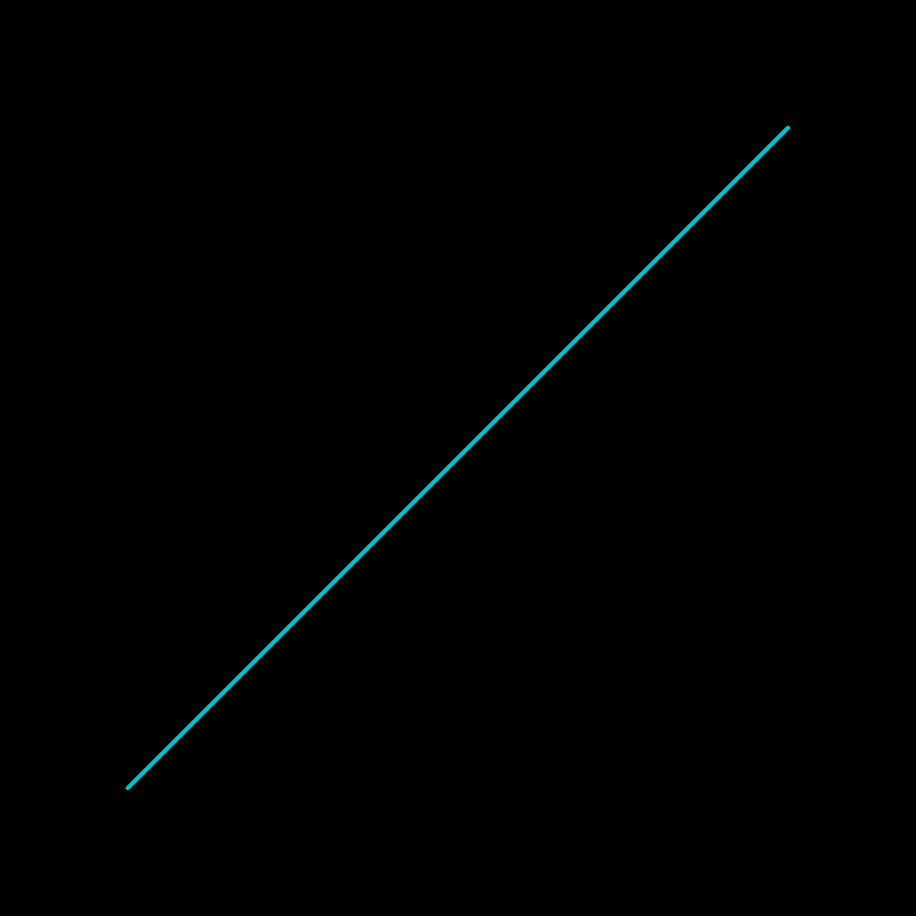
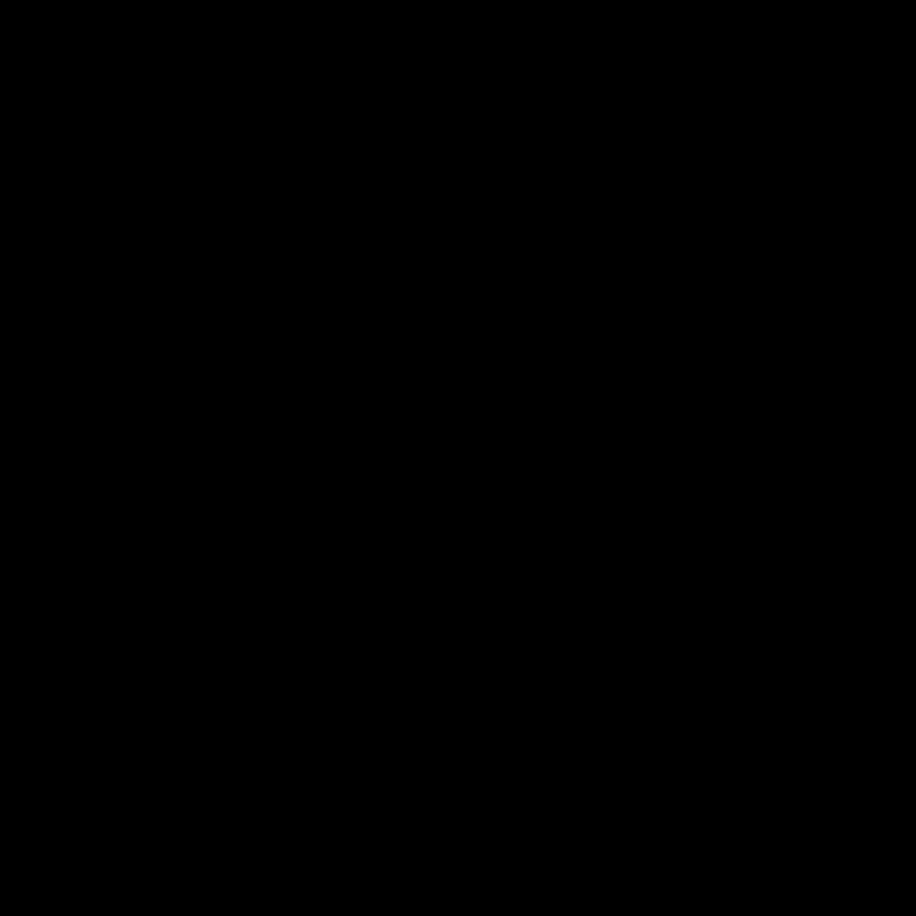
line: (788, 127) (127, 788) -> none

